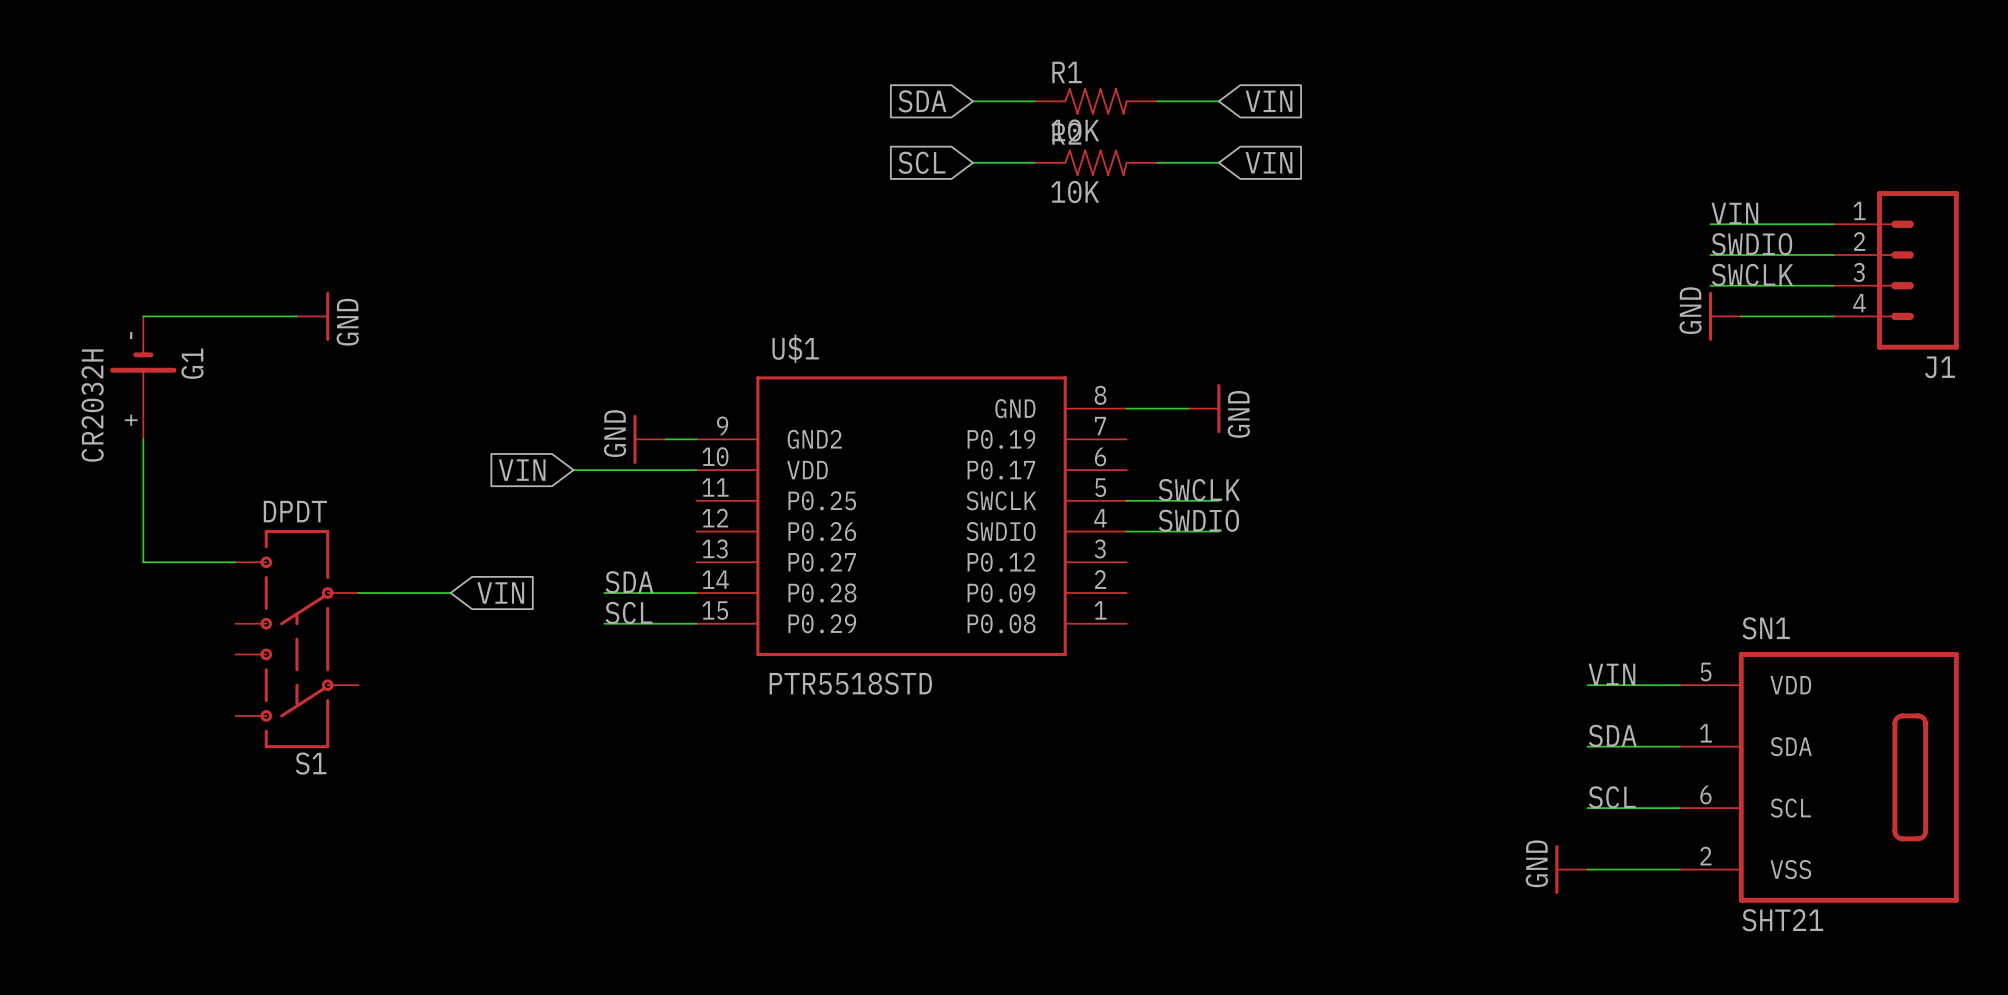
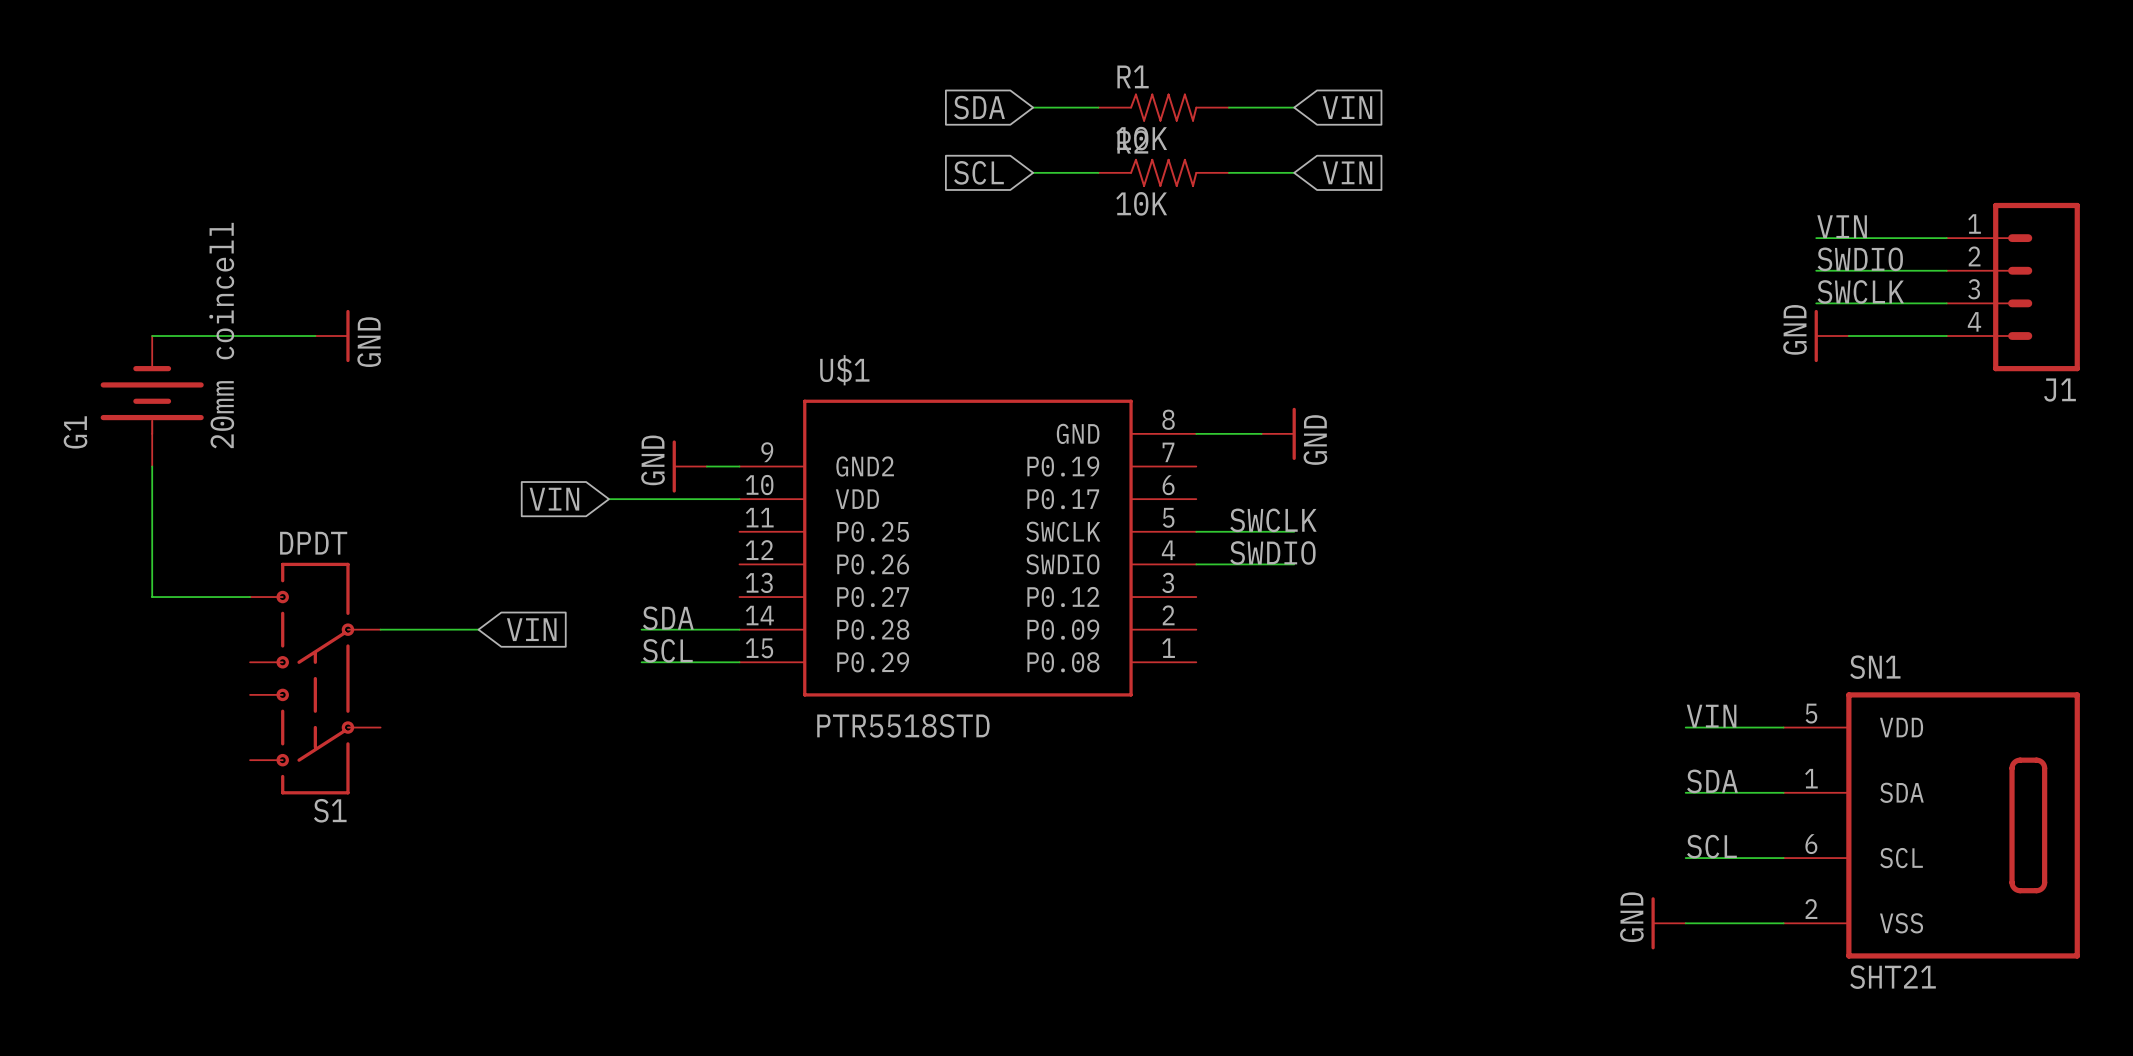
G1 symbol: [110, 316, 177, 440] -> [100, 336, 204, 467]
G1 name position: G1 (192, 363) -> G1 (75, 432)
G1 value: CR2032H (92, 405) -> 20mm coincell (221, 335)

